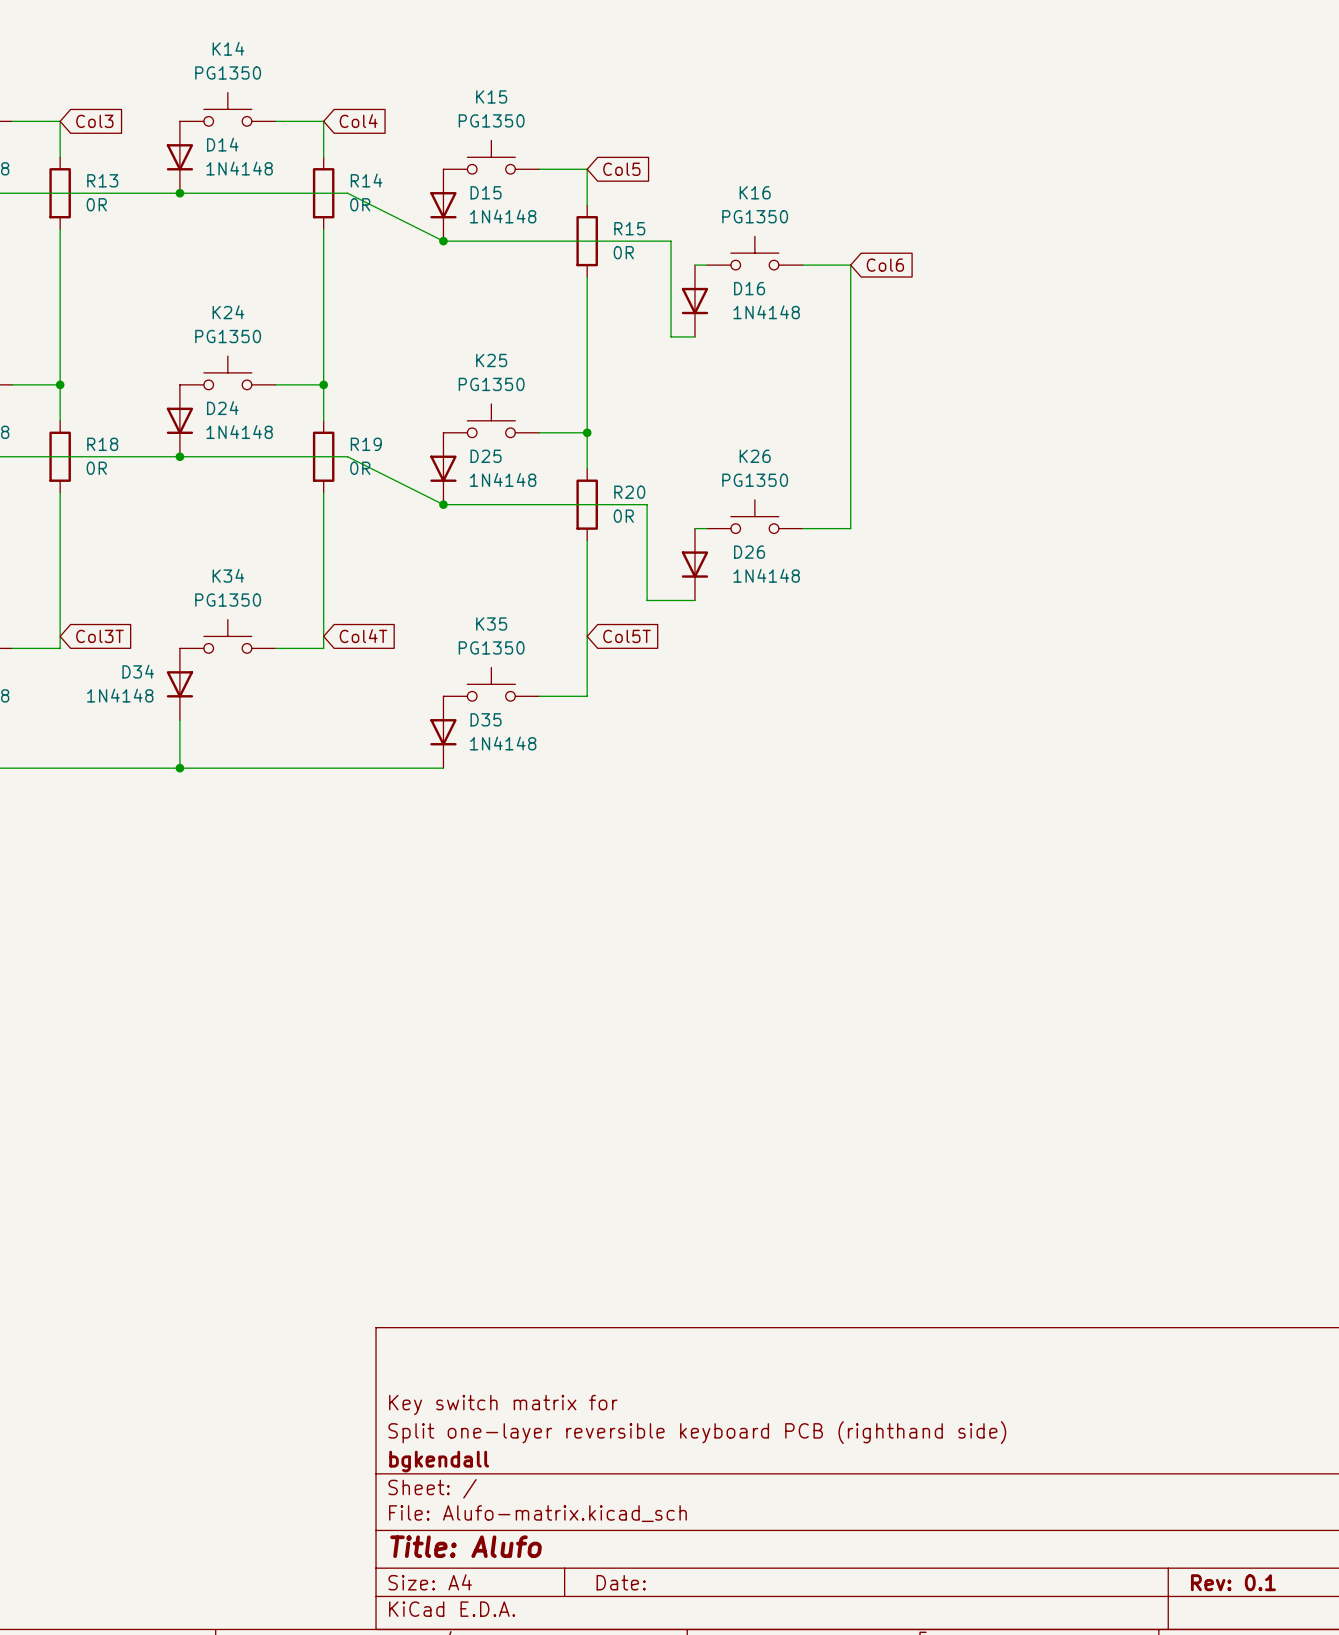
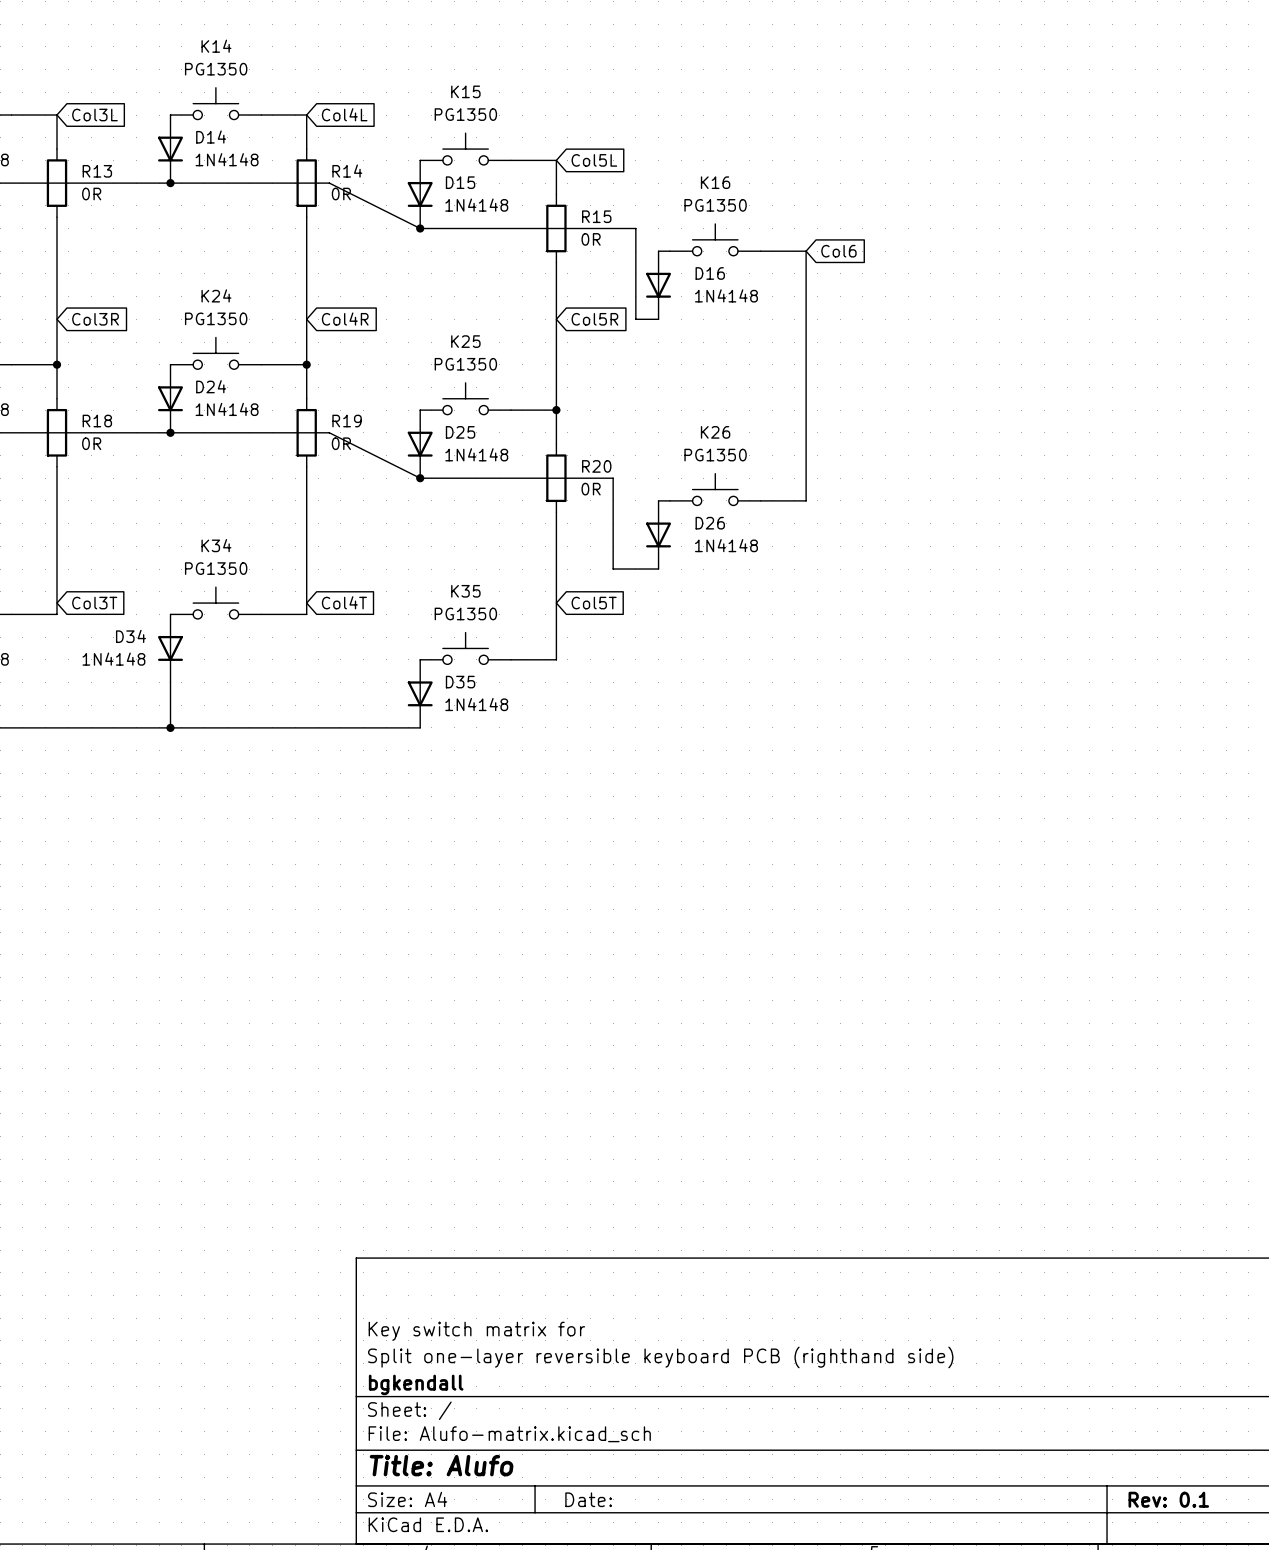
global label: Col3 (94, 121) -> Col3L (94, 115)
global label: Col4 (358, 121) -> Col4L (344, 114)
global label: Col5 (621, 169) -> Col5L (594, 160)
global label: none -> Col3R (95, 319)
global label: none -> Col4R (345, 319)
global label: none -> Col5R (594, 319)

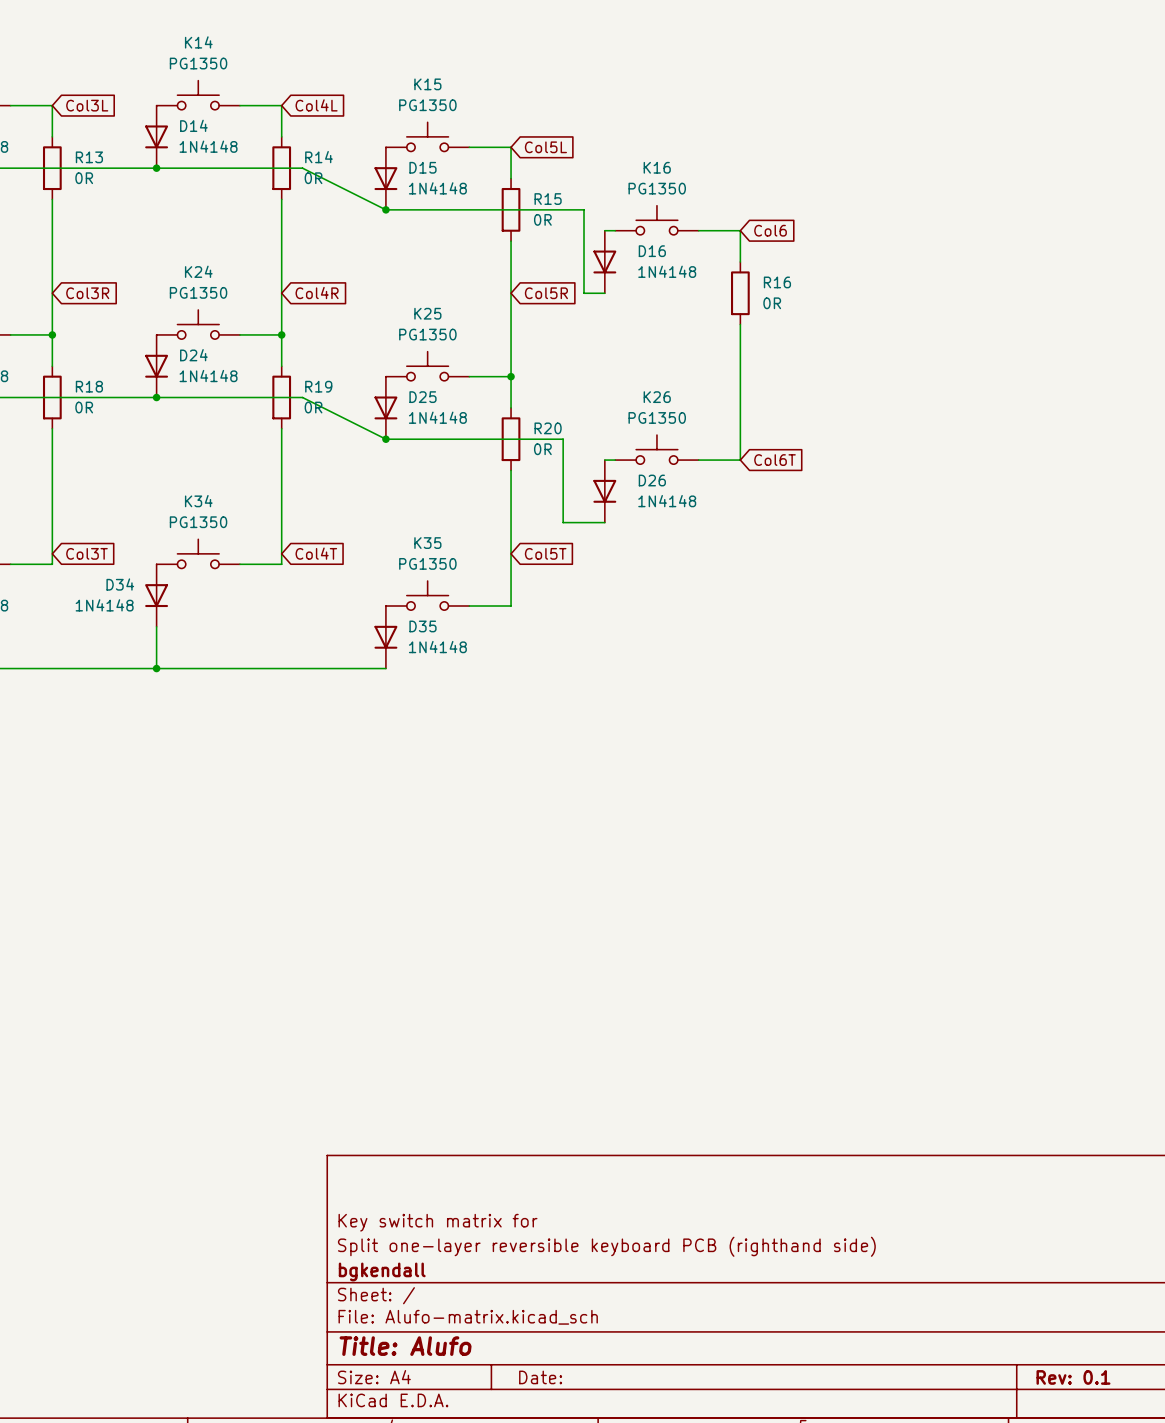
wire: (806, 285) (806, 353) -> none
R16: none -> 0R (740, 293)
global label: none -> Col6T (775, 460)

